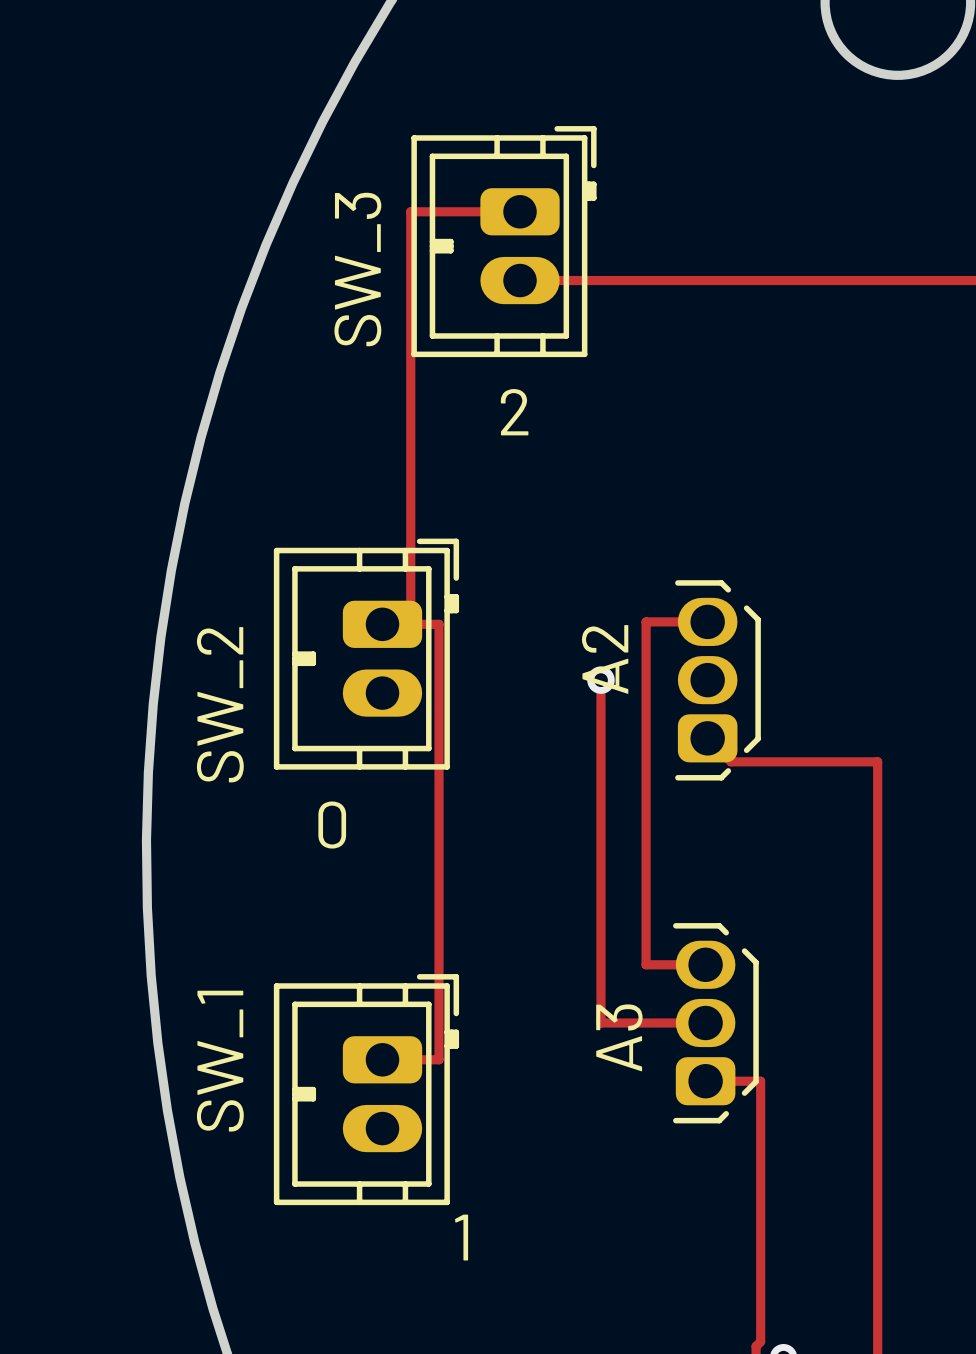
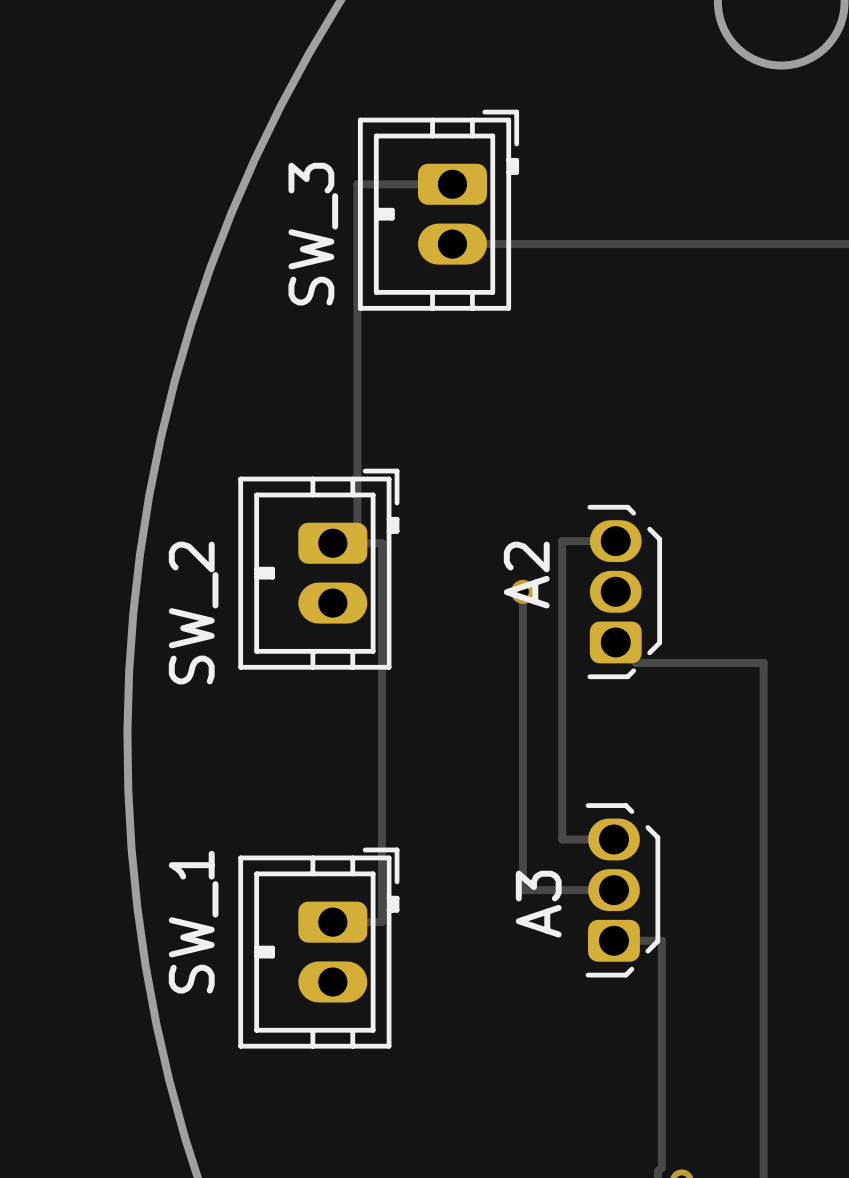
text: 2 (514, 412) -> none
text: 0 (332, 825) -> none
text: 1 (461, 1237) -> none

